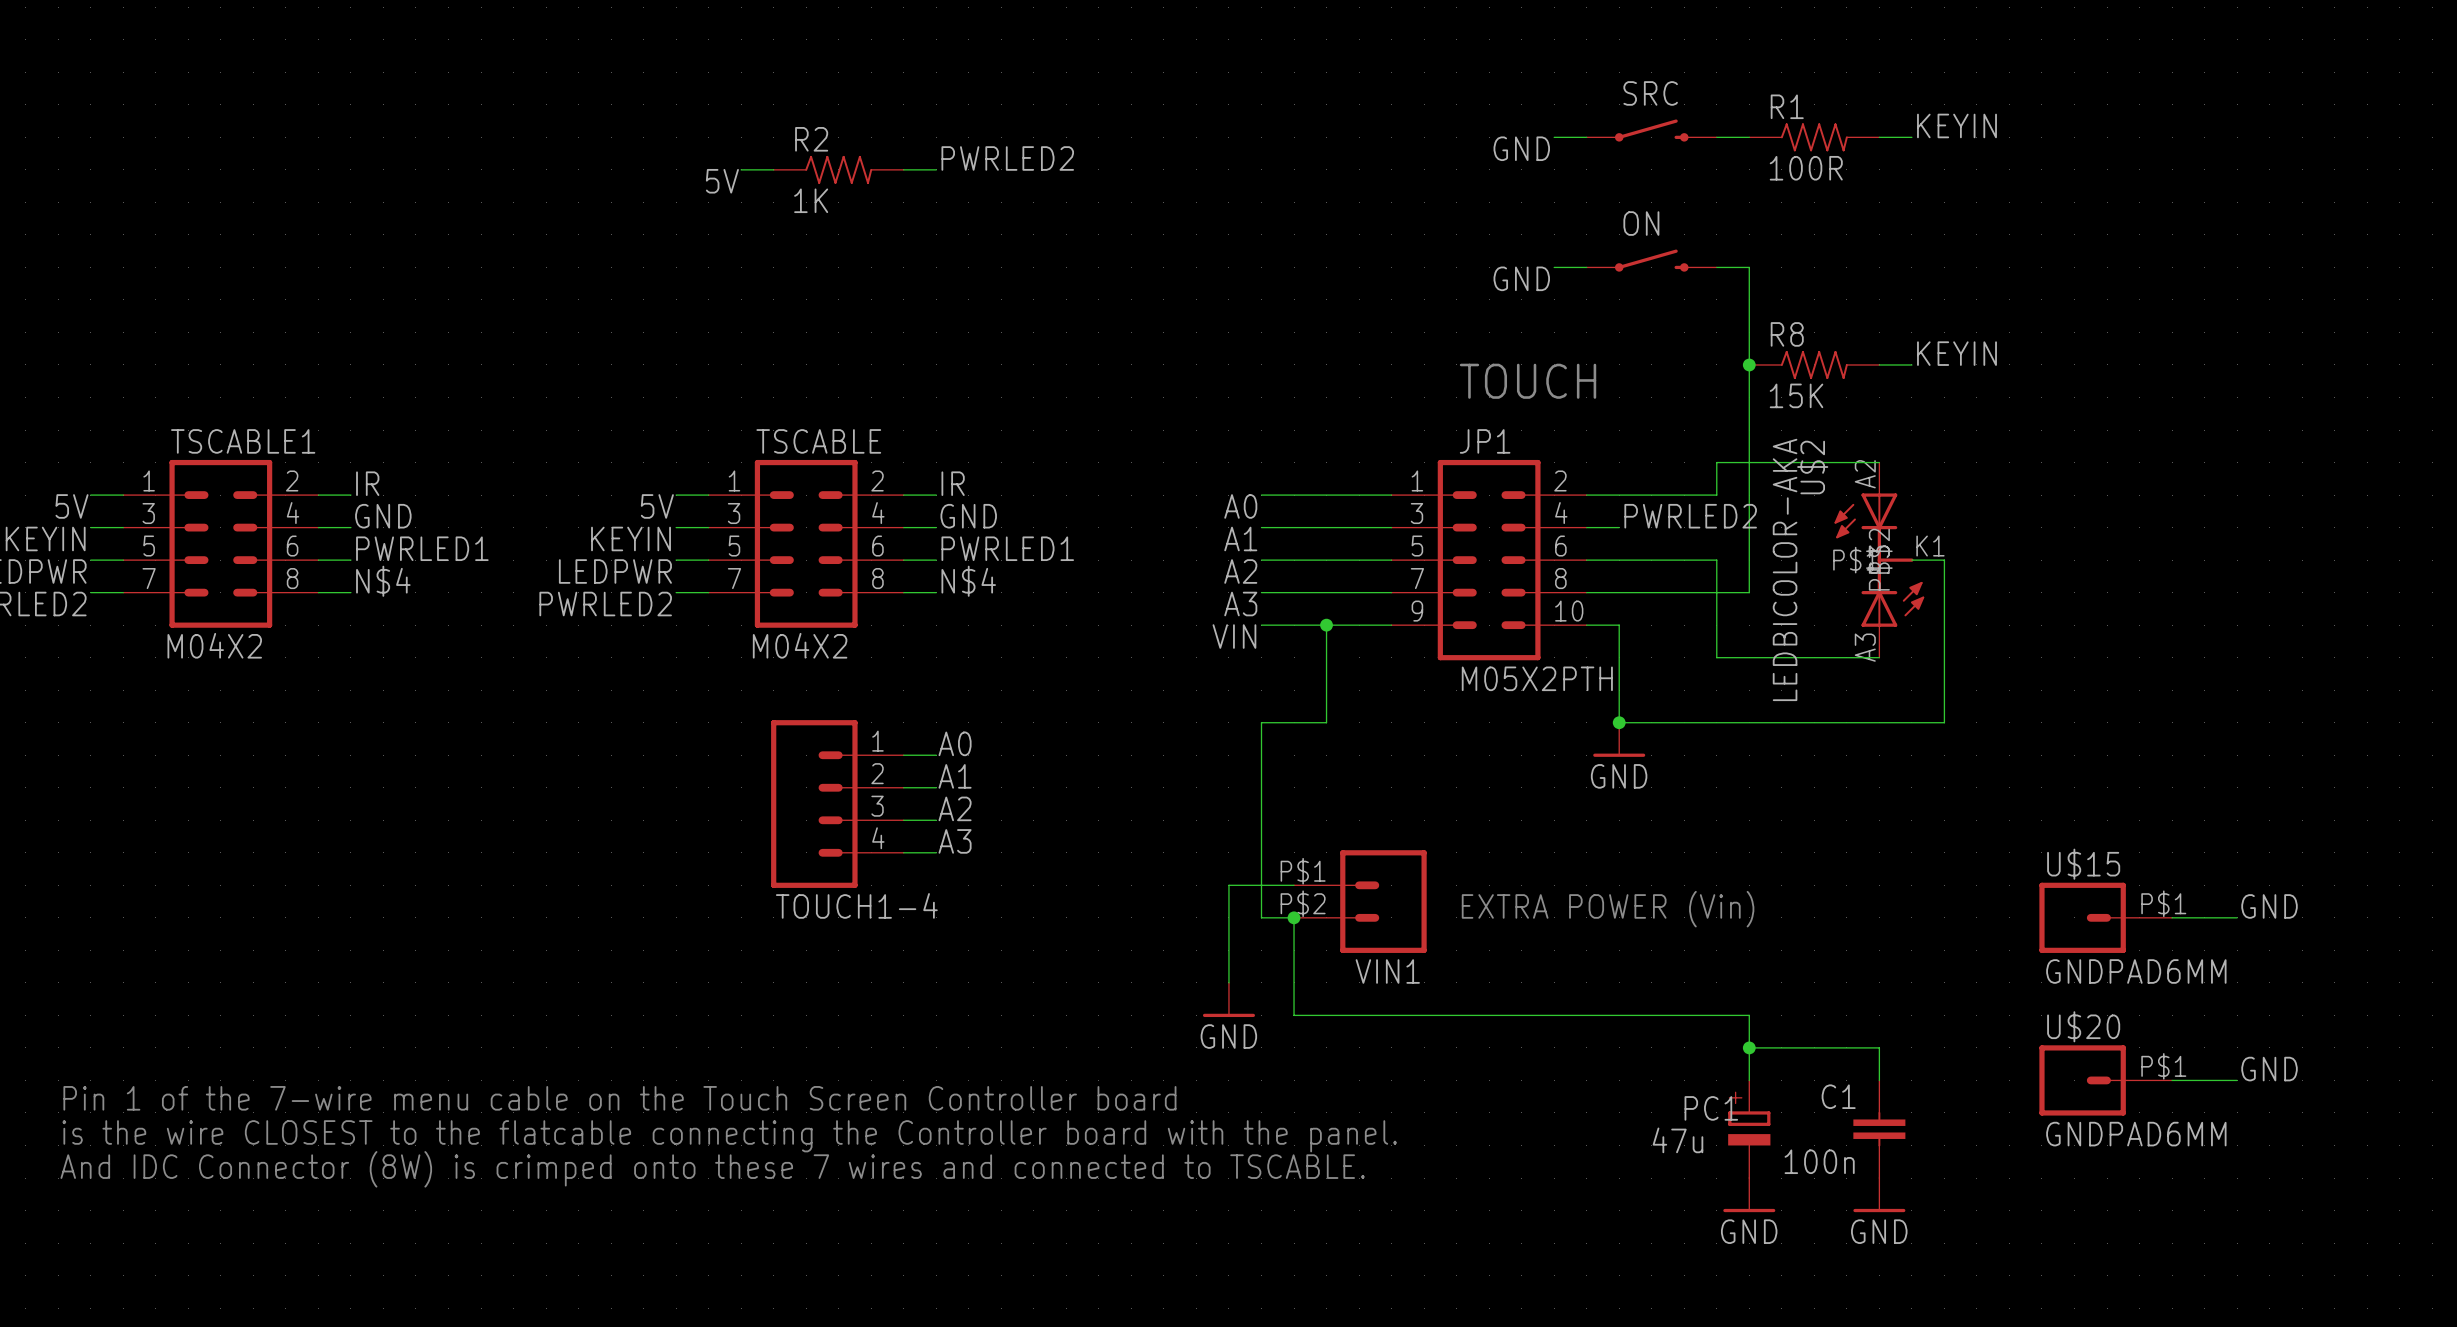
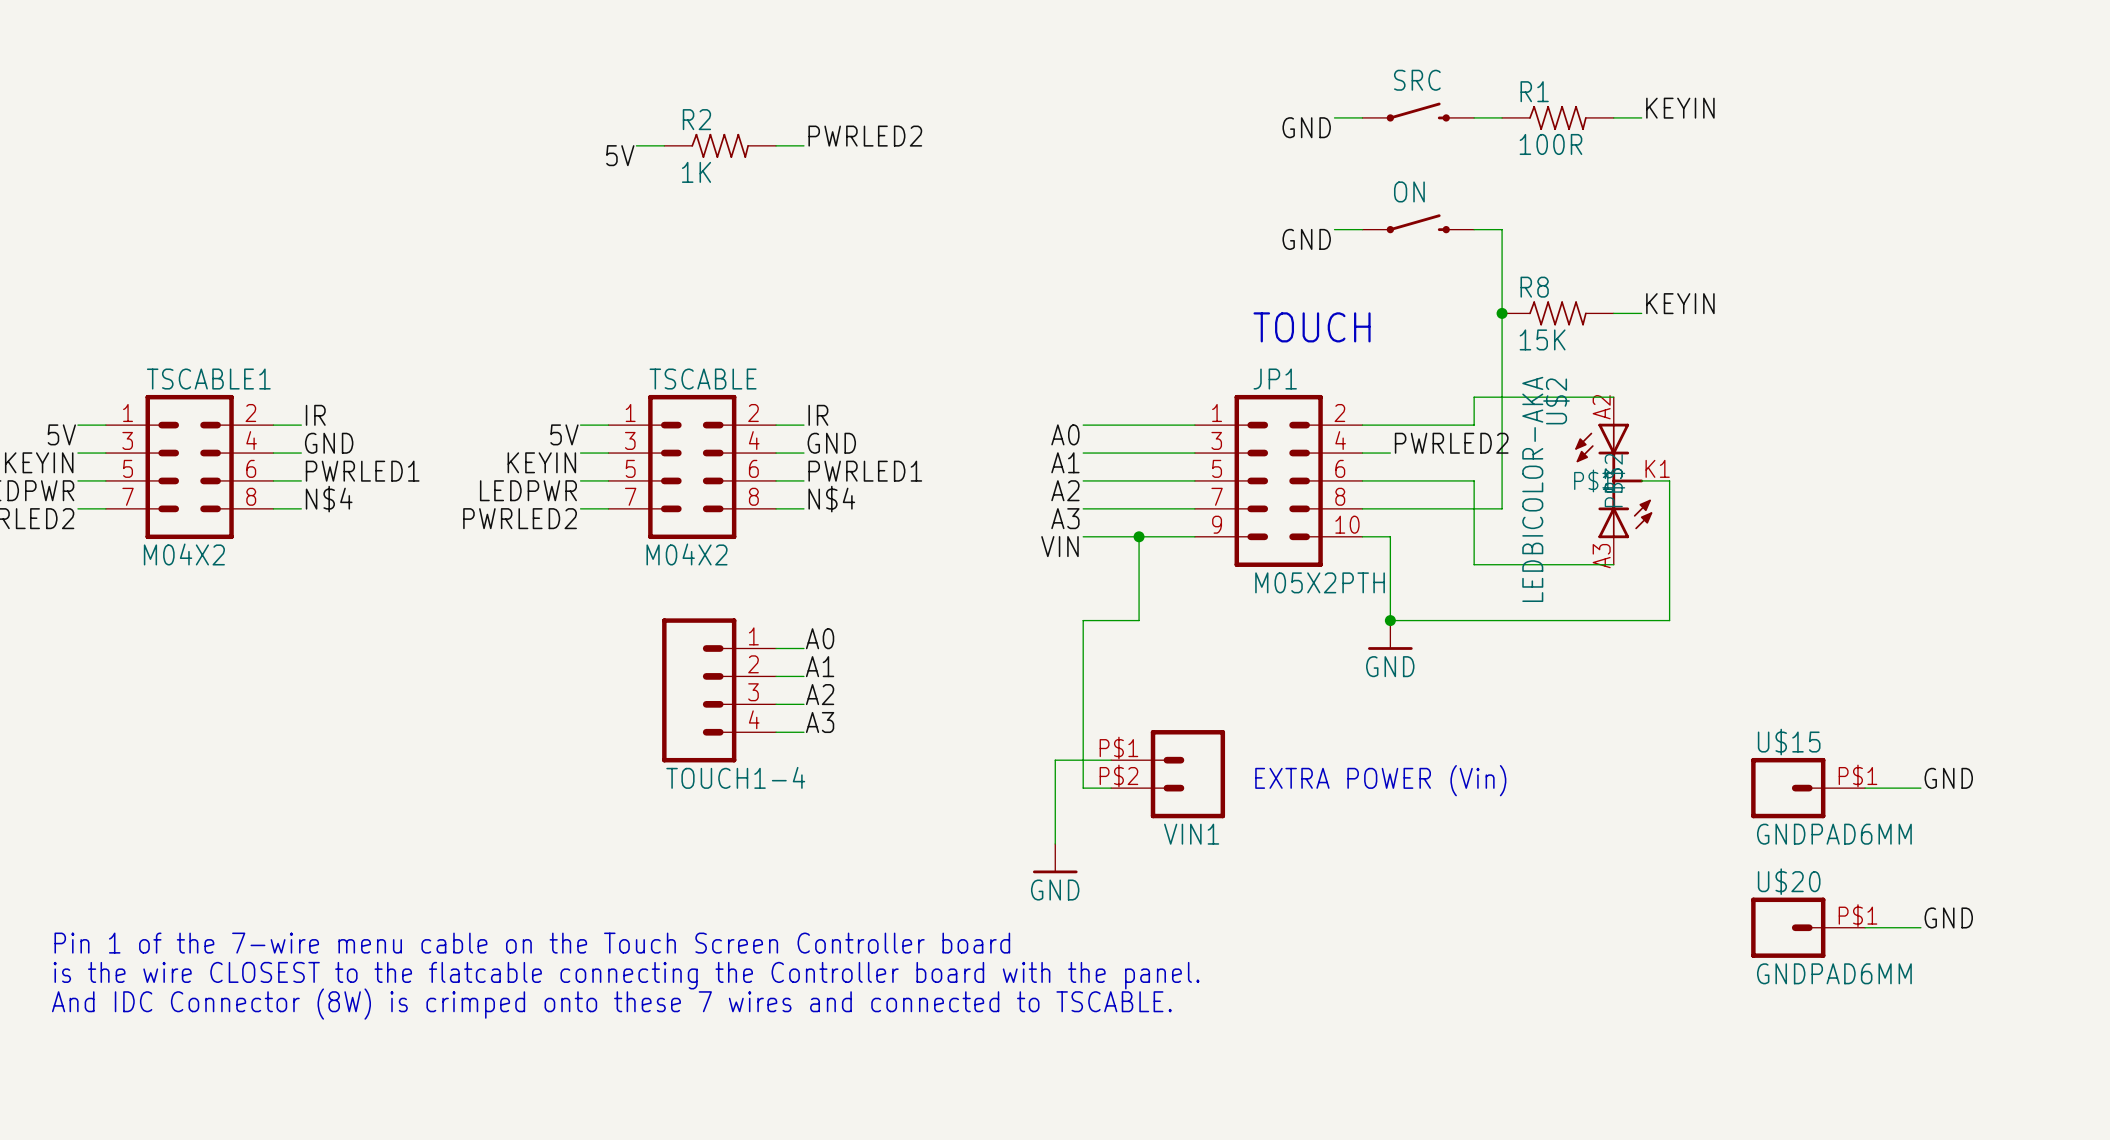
wire: (1294, 917) (1294, 1015) (1749, 1015) (1749, 1080) -> none
junction: (1294, 917) -> none
wire: (1749, 1047) (1879, 1047) (1879, 1080) -> none
junction: (1749, 1047) -> none
PC1: 47u (1749, 1129) -> none
C1: 100n (1879, 1129) -> none
power symbol: GND (1749, 1195) -> none
power symbol: GND (1879, 1195) -> none

